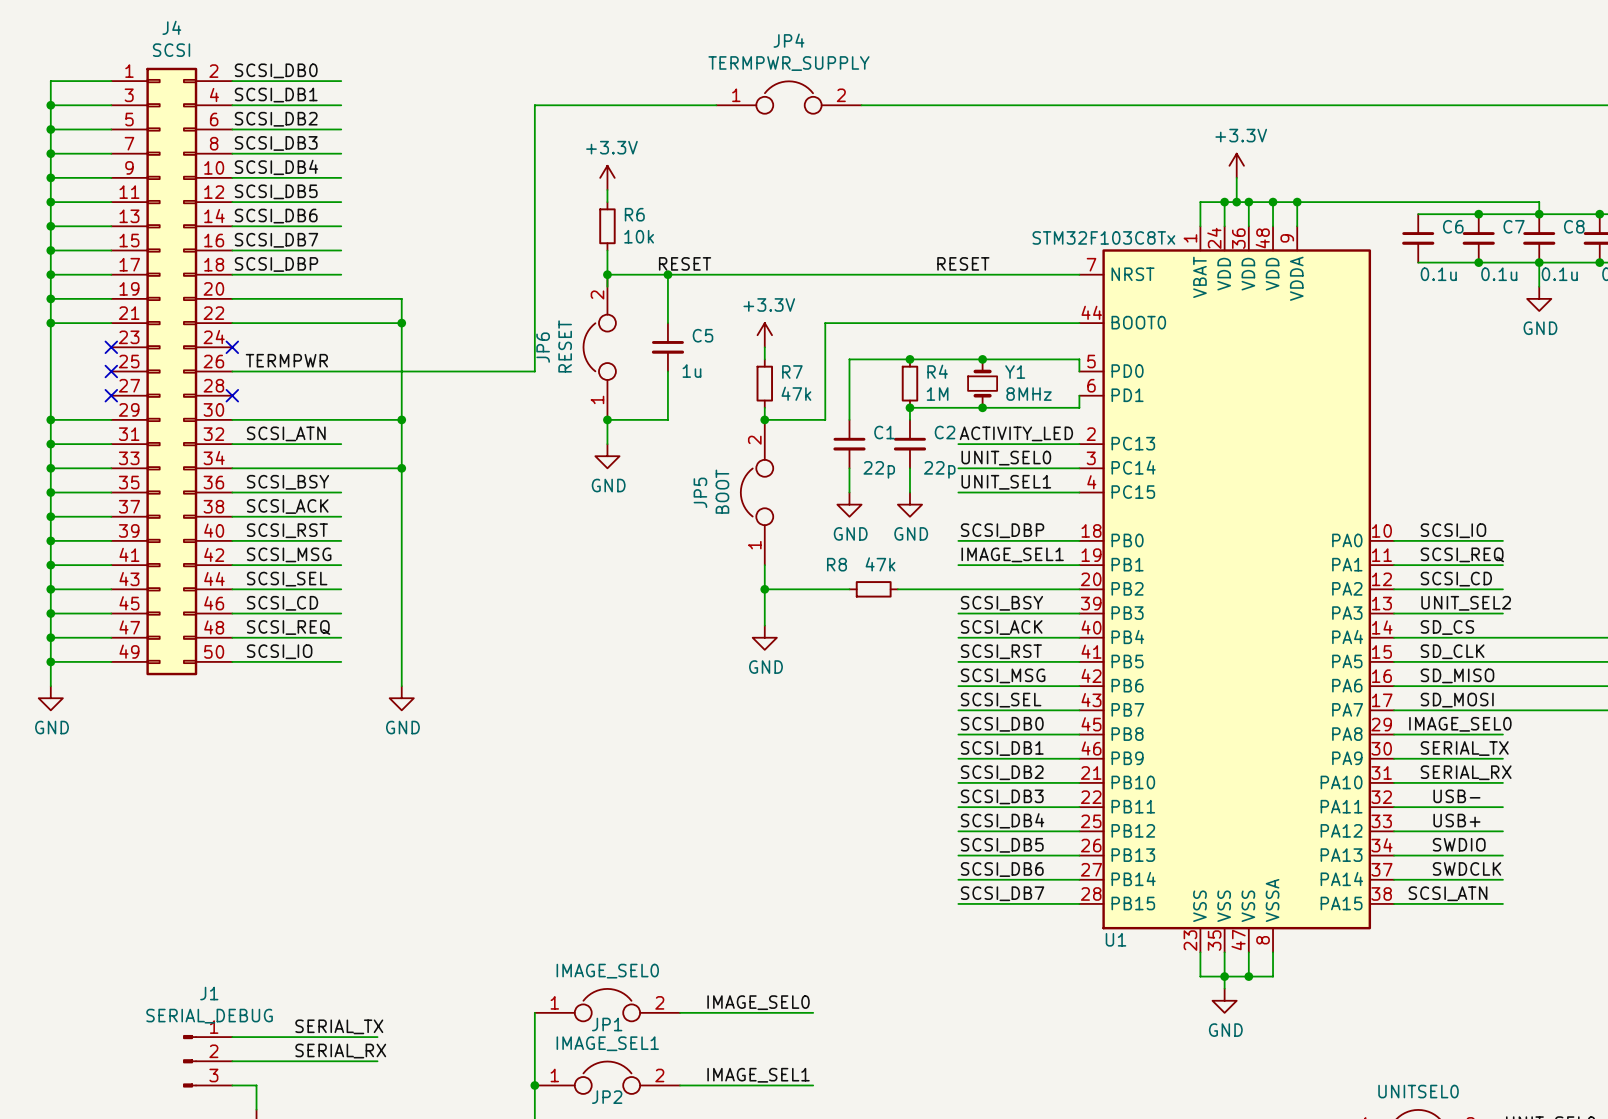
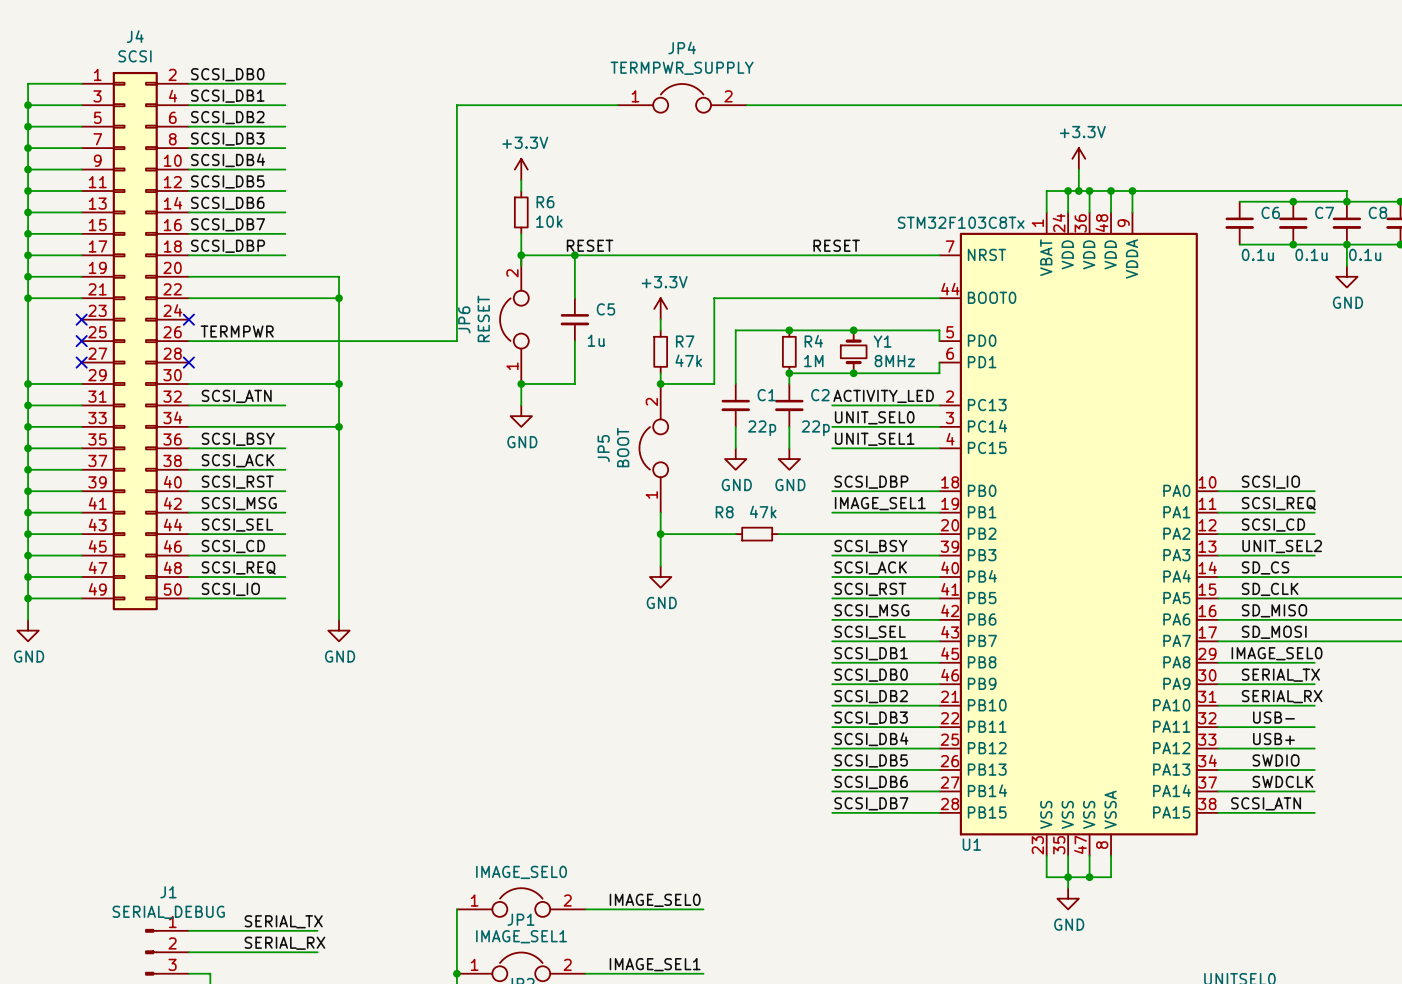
label: SCSI_DB0 (1002, 724) -> SCSI_DB1 (871, 653)
label: SCSI_DB1 (1002, 748) -> SCSI_DB0 (871, 675)

